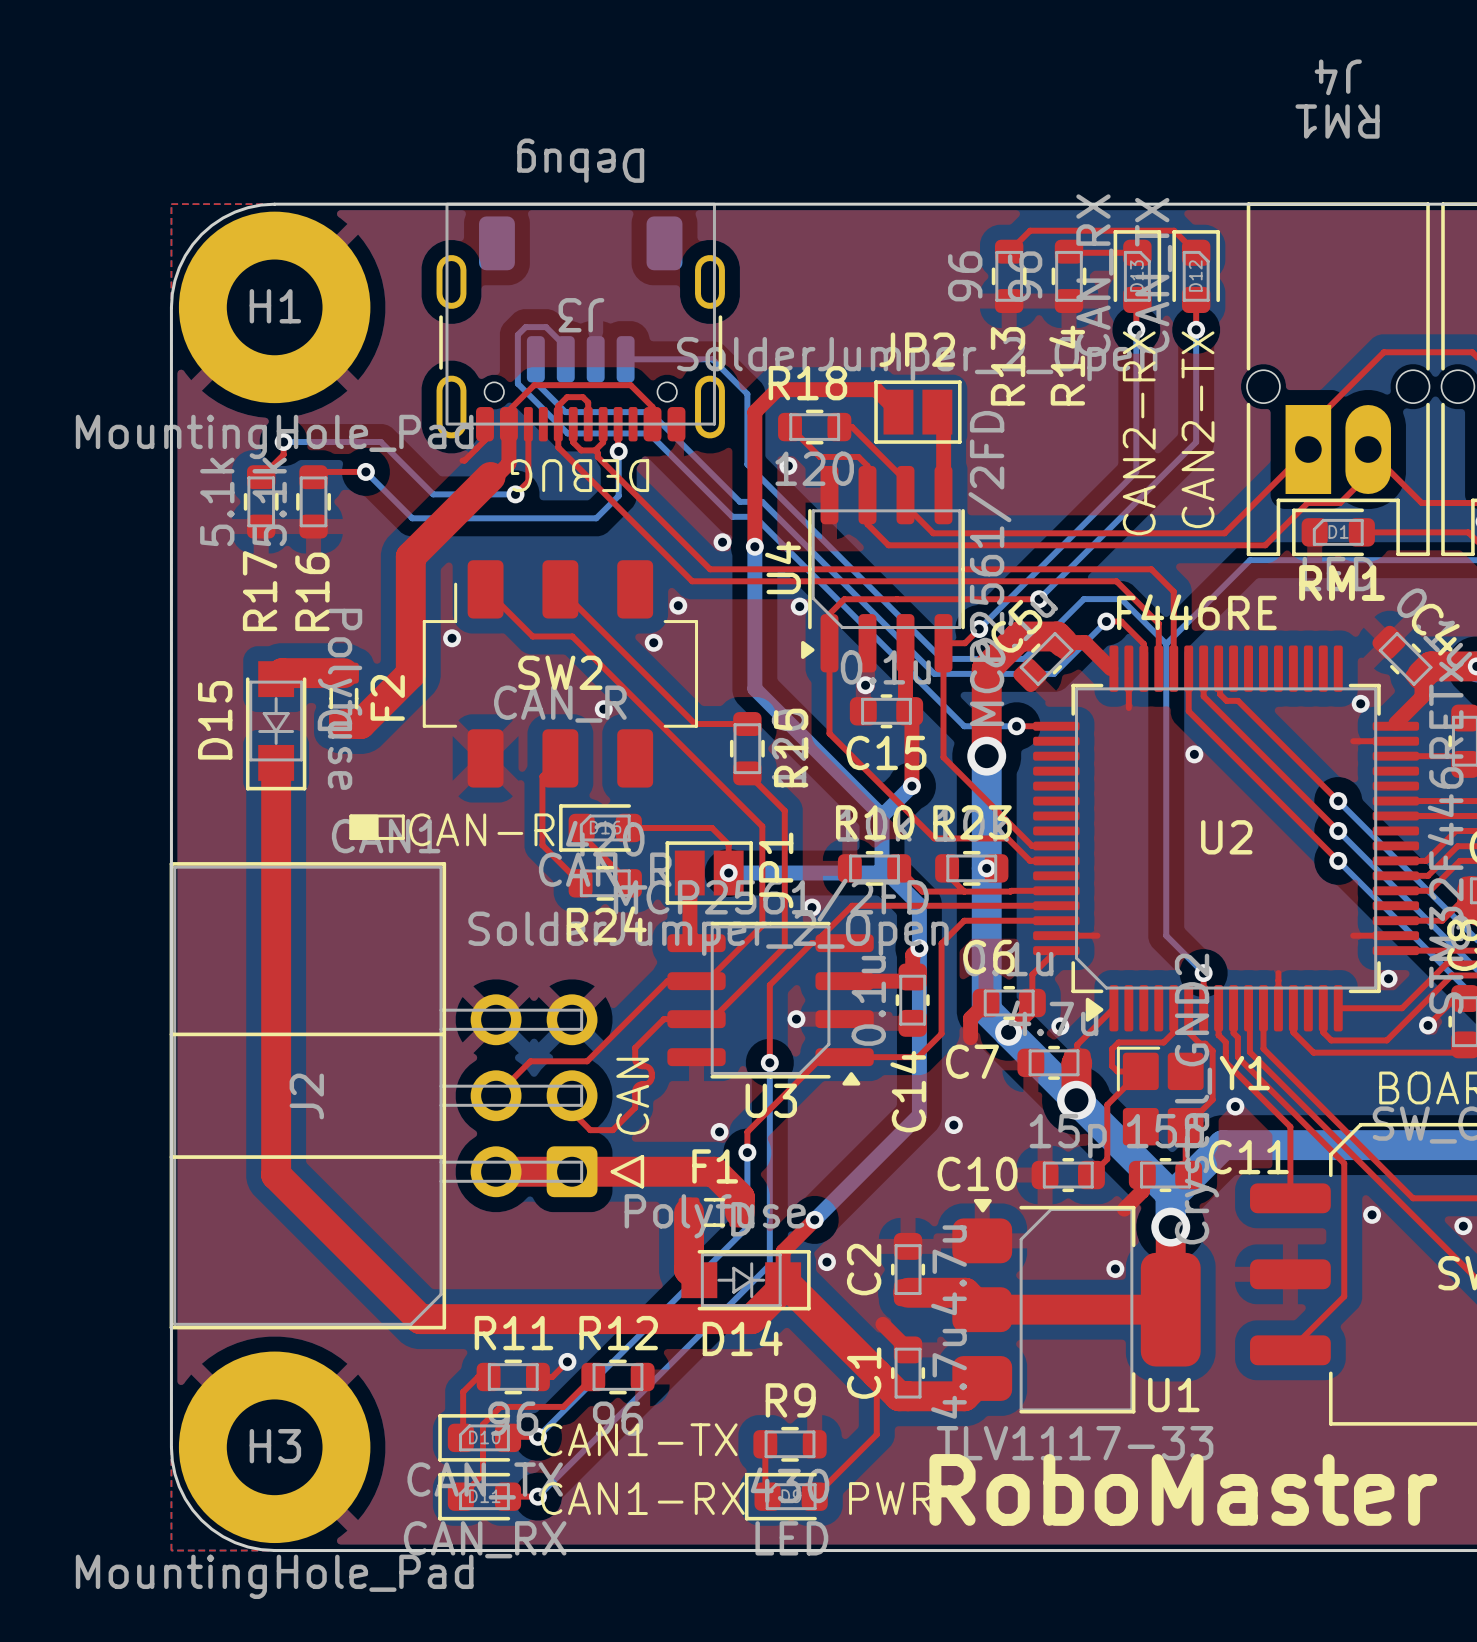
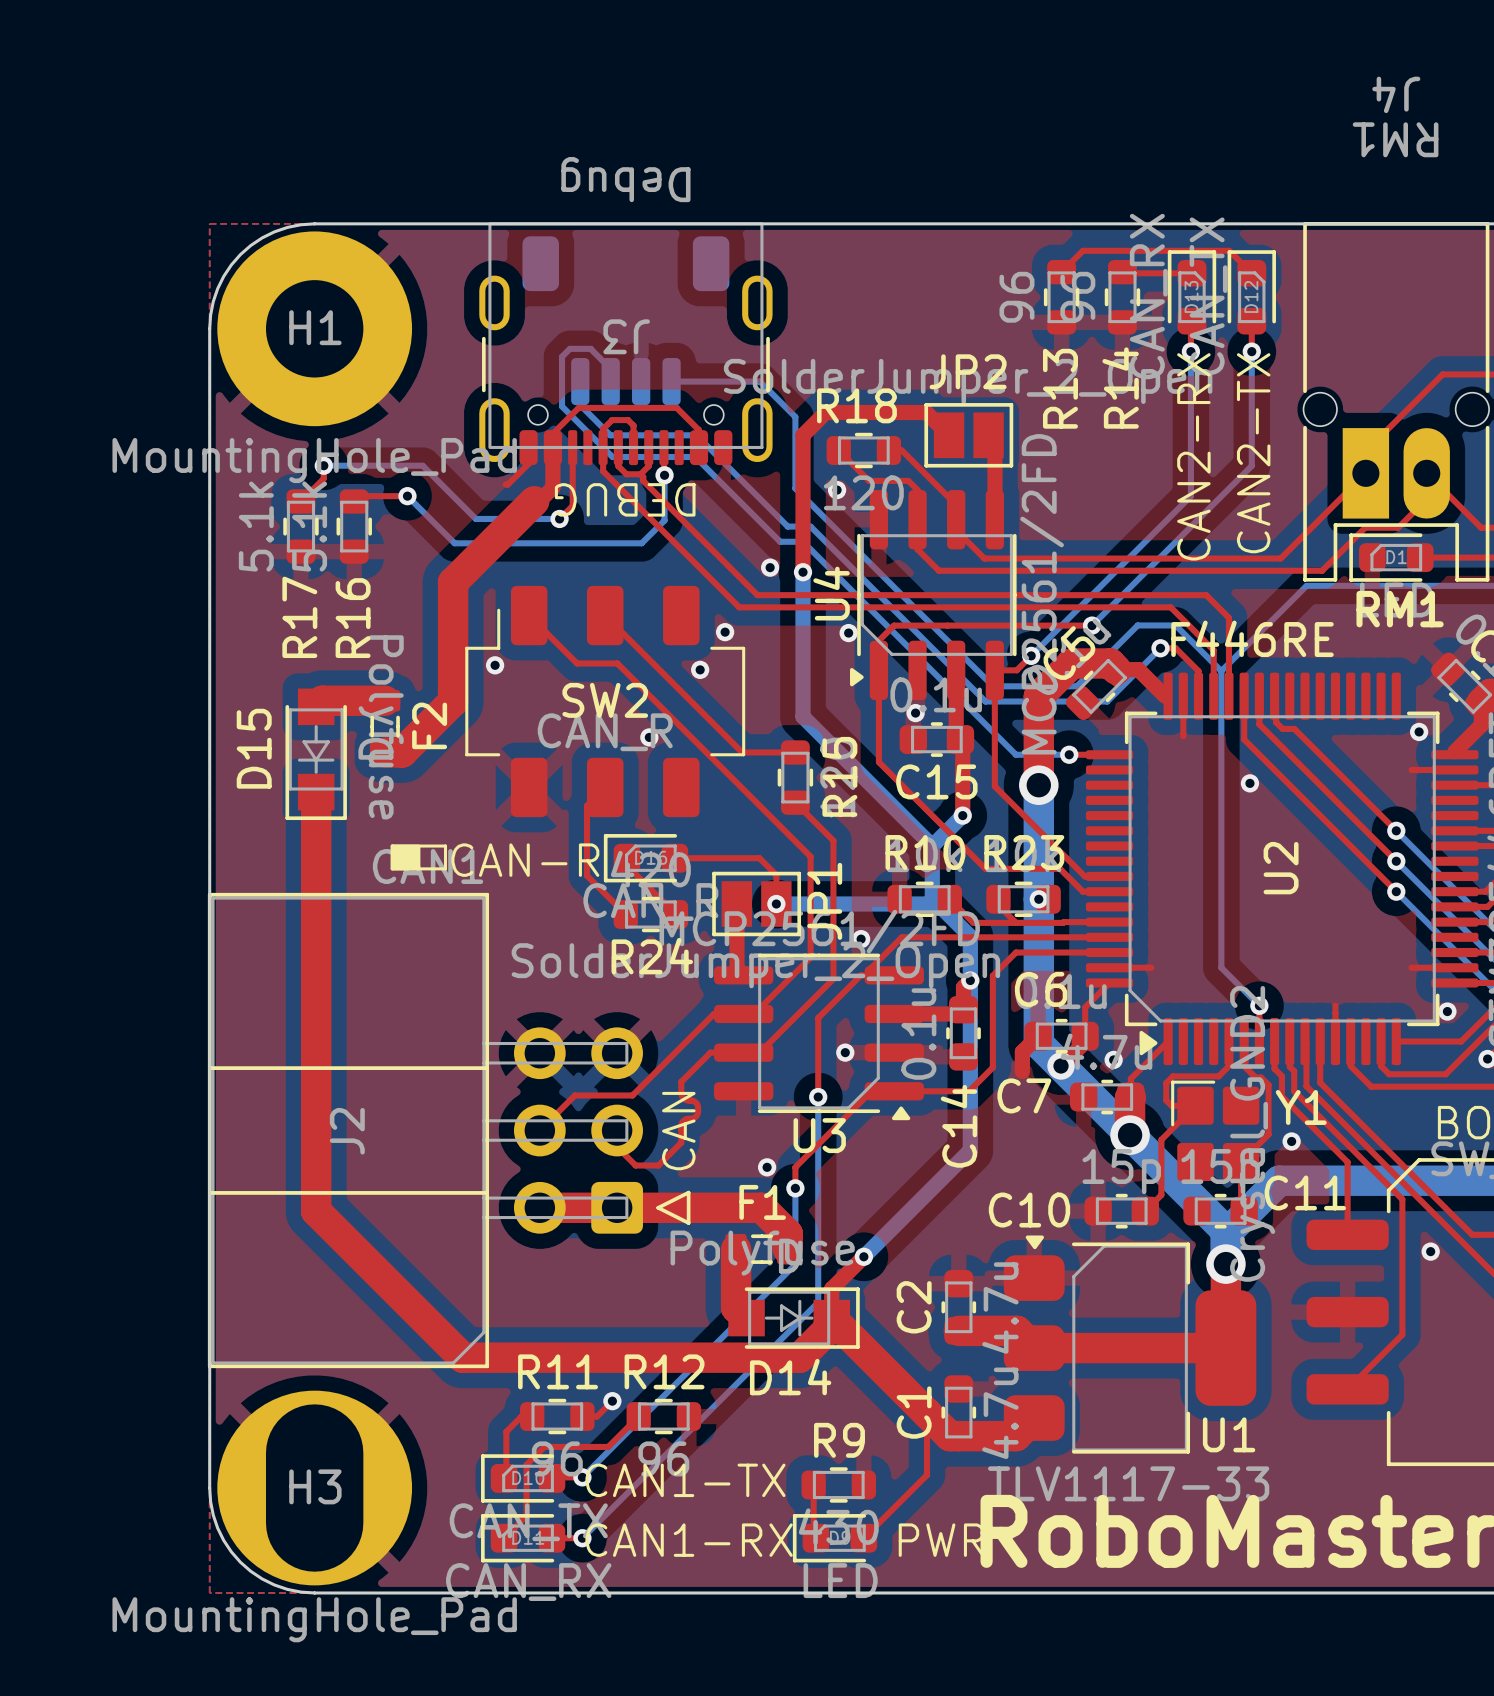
U2 name rotation: 0° (1226, 837) -> 90° counterclockwise (1281, 868)
via: (953, 1125) -> none
top track: (1142, 1175) (1142, 1191) (1124, 1209) -> none
via: (826, 1262) -> none
via: (1115, 1268) -> none
top track: (882, 1324) (908, 1349) -> none
H3 footprint: [178, 1351, 371, 1544] -> [217, 1390, 413, 1586]

